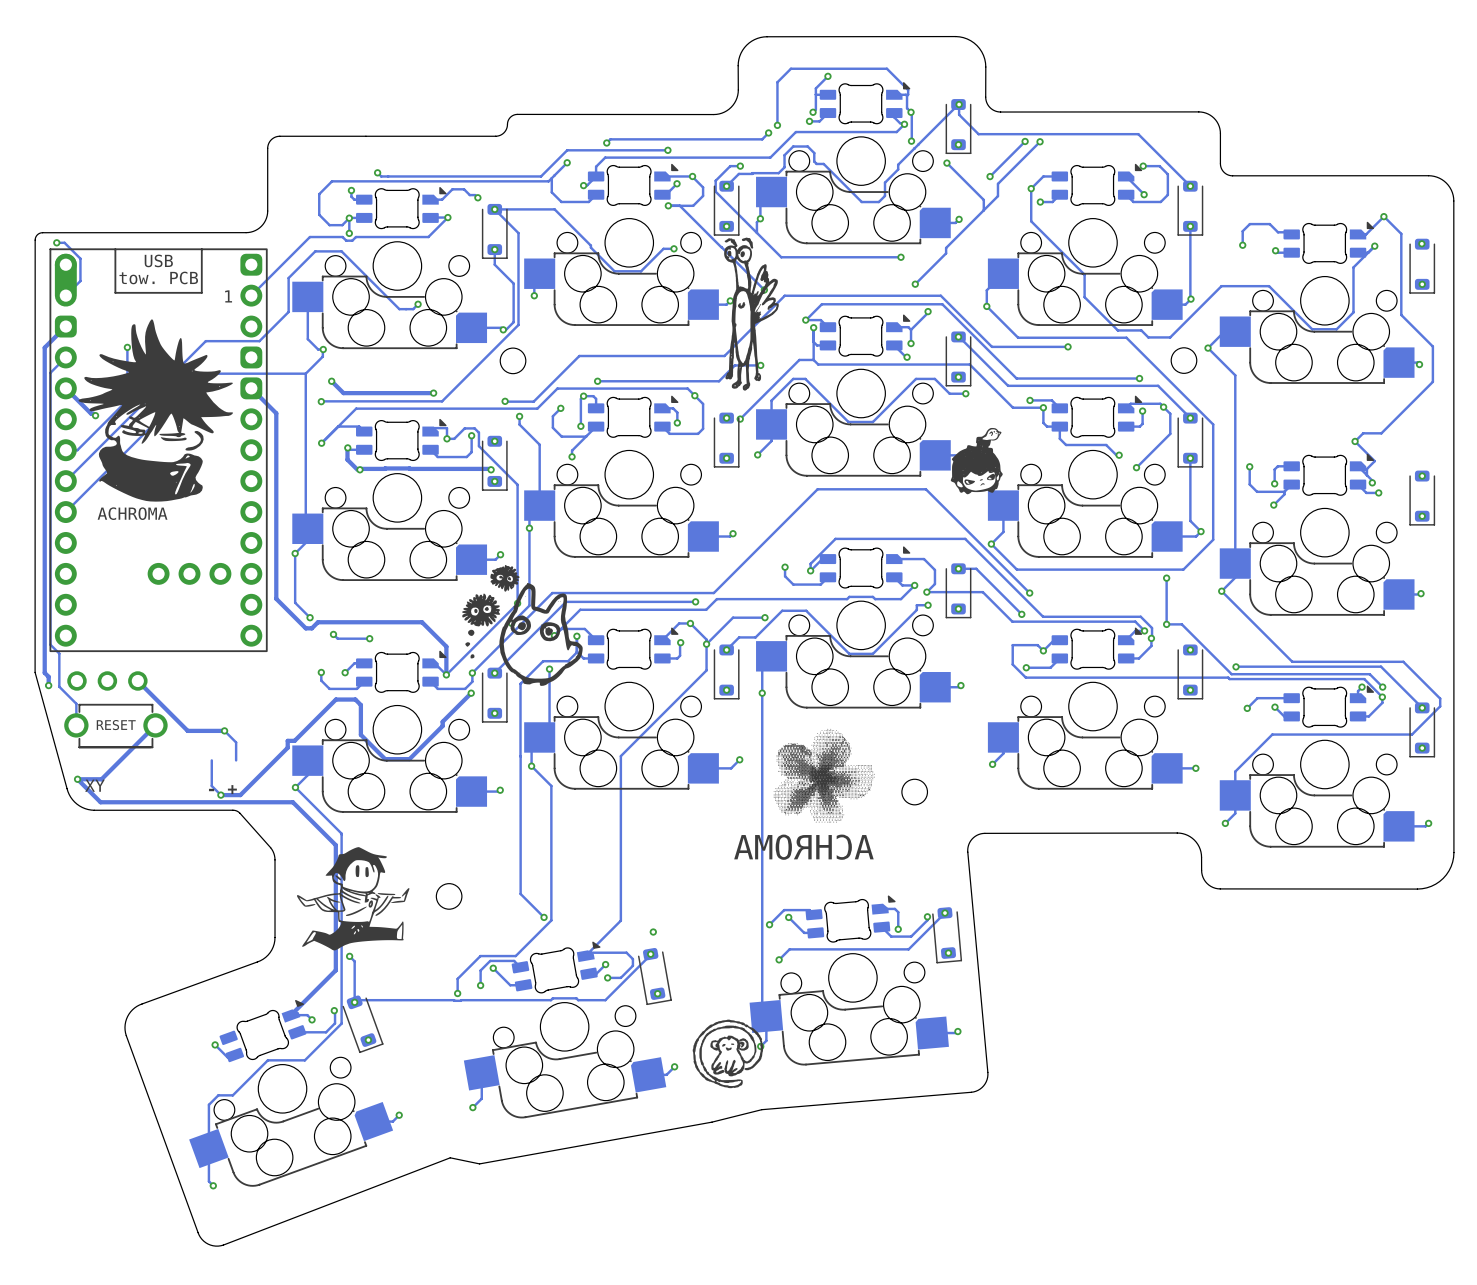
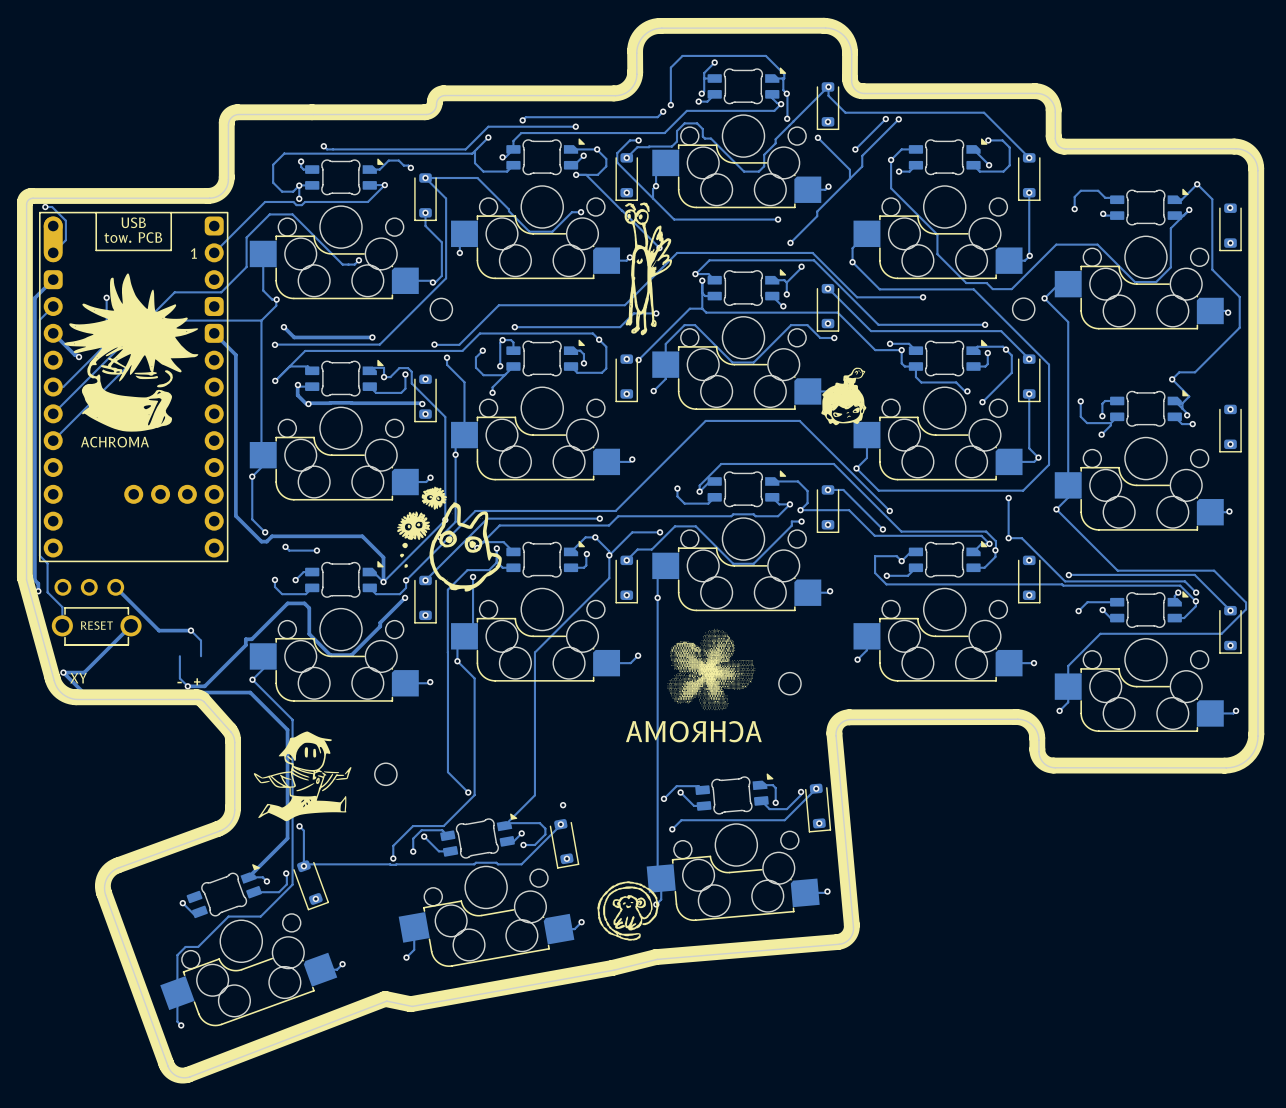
line: none -> (424, 112) (234, 112) (229, 115) (226, 121) (226, 181) (222, 188) (216, 194) (207, 195) (31, 196) (25, 200) (24, 577) (53, 681) (61, 691) (73, 697) (199, 697) (229, 729) (232, 738) (232, 810) (227, 822) (217, 828) (115, 866) (108, 871) (103, 881) (103, 892) (166, 1063) (171, 1071) (179, 1075) (188, 1074) (385, 998) (410, 1004) (612, 967) (655, 957) (843, 940) (850, 932) (851, 924) (834, 731) (838, 722) (845, 717) (1020, 717) (1027, 720) (1034, 726) (1037, 735) (1038, 755) (1043, 762) (1051, 765) (1224, 765) (1236, 763) (1249, 753) (1253, 746) (1256, 733) (1256, 168) (1254, 158) (1247, 151) (1234, 146) (1061, 146) (1056, 143) (1053, 138) (1051, 101) (1044, 94) (1037, 91) (858, 90) (853, 87) (850, 81) (849, 48) (846, 39) (836, 29) (823, 25) (654, 26) (644, 31) (637, 40) (635, 48) (634, 79) (628, 87) (620, 92) (442, 93) (436, 97) (431, 109) (424, 112)

